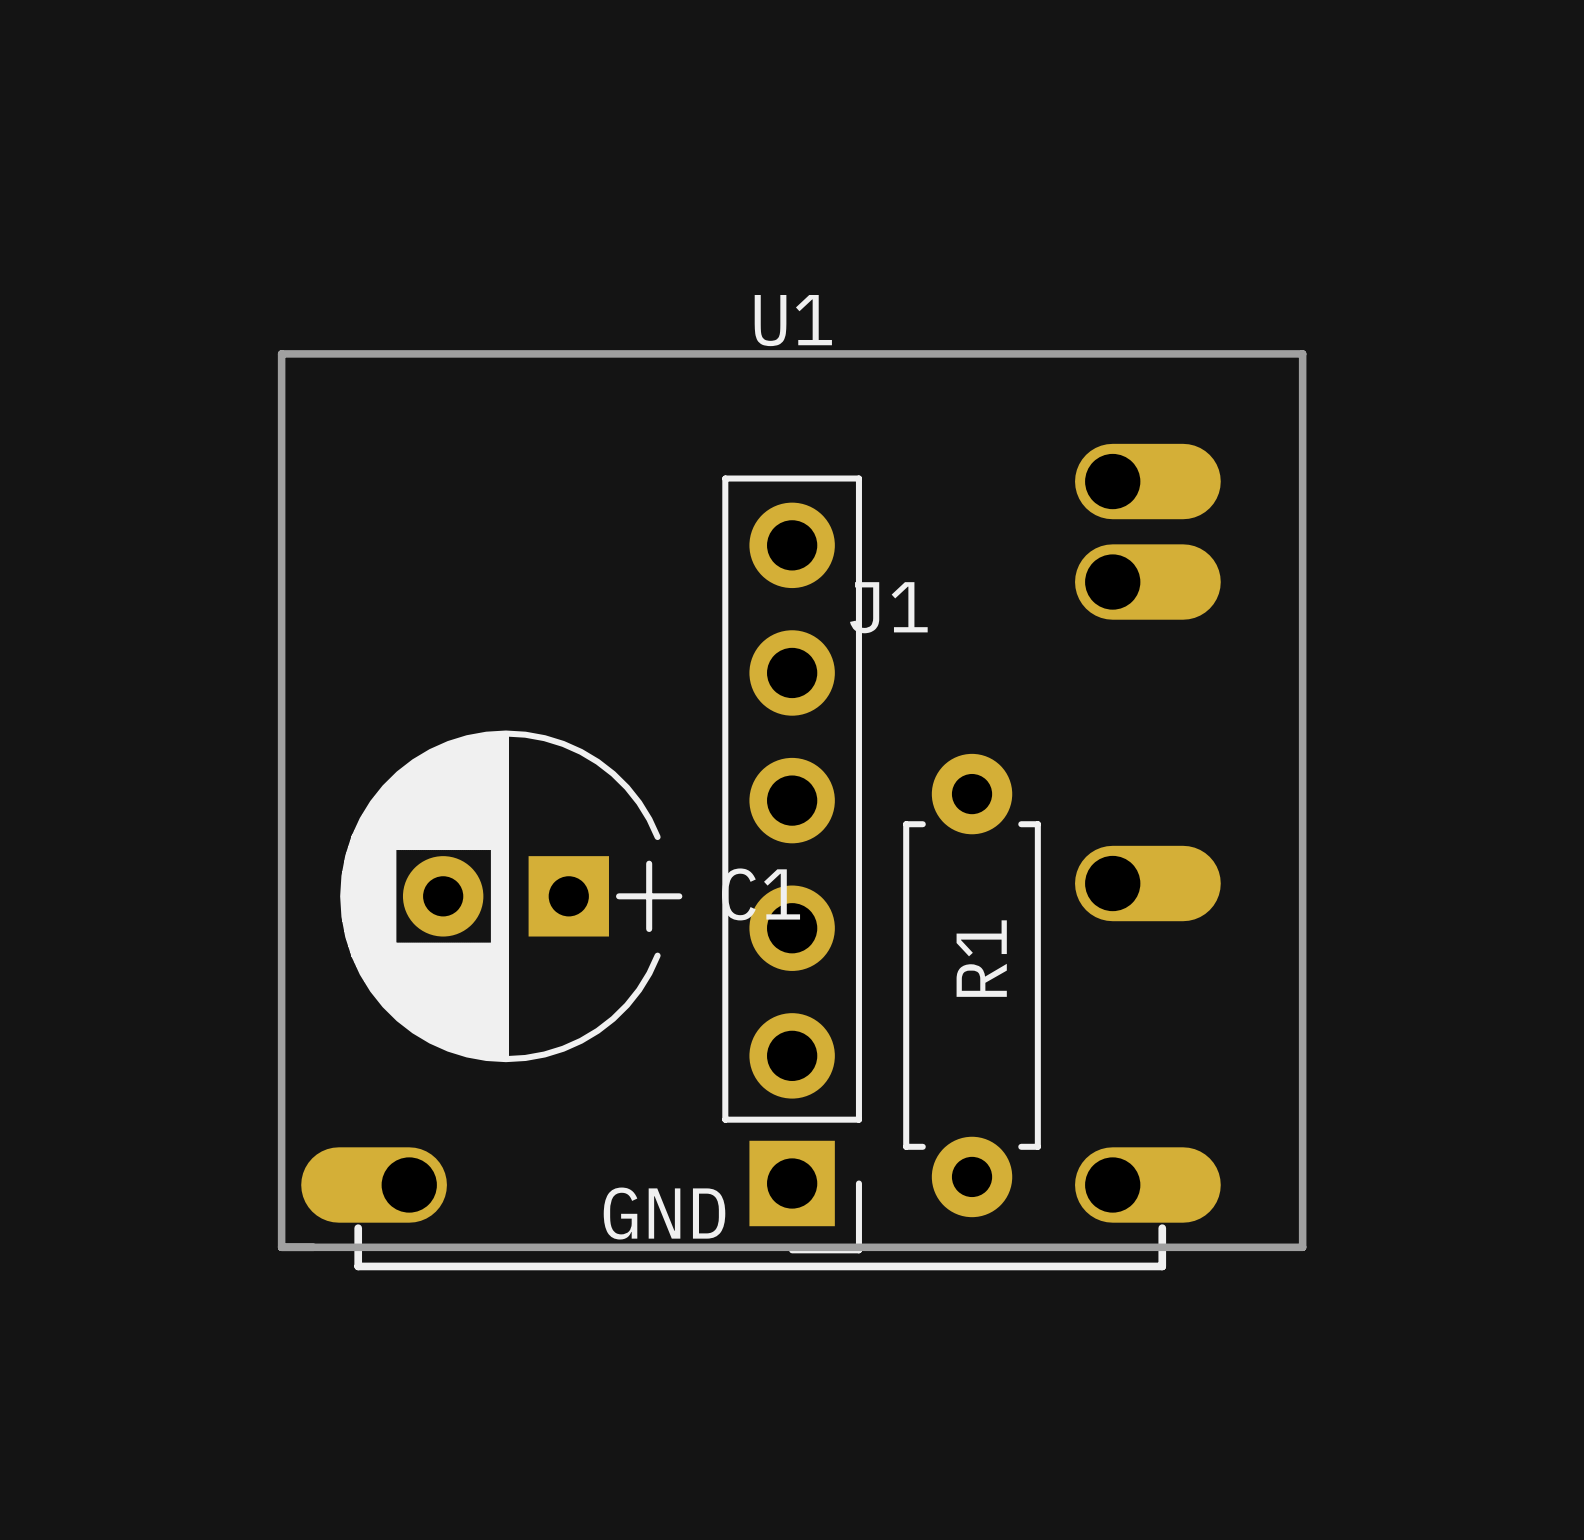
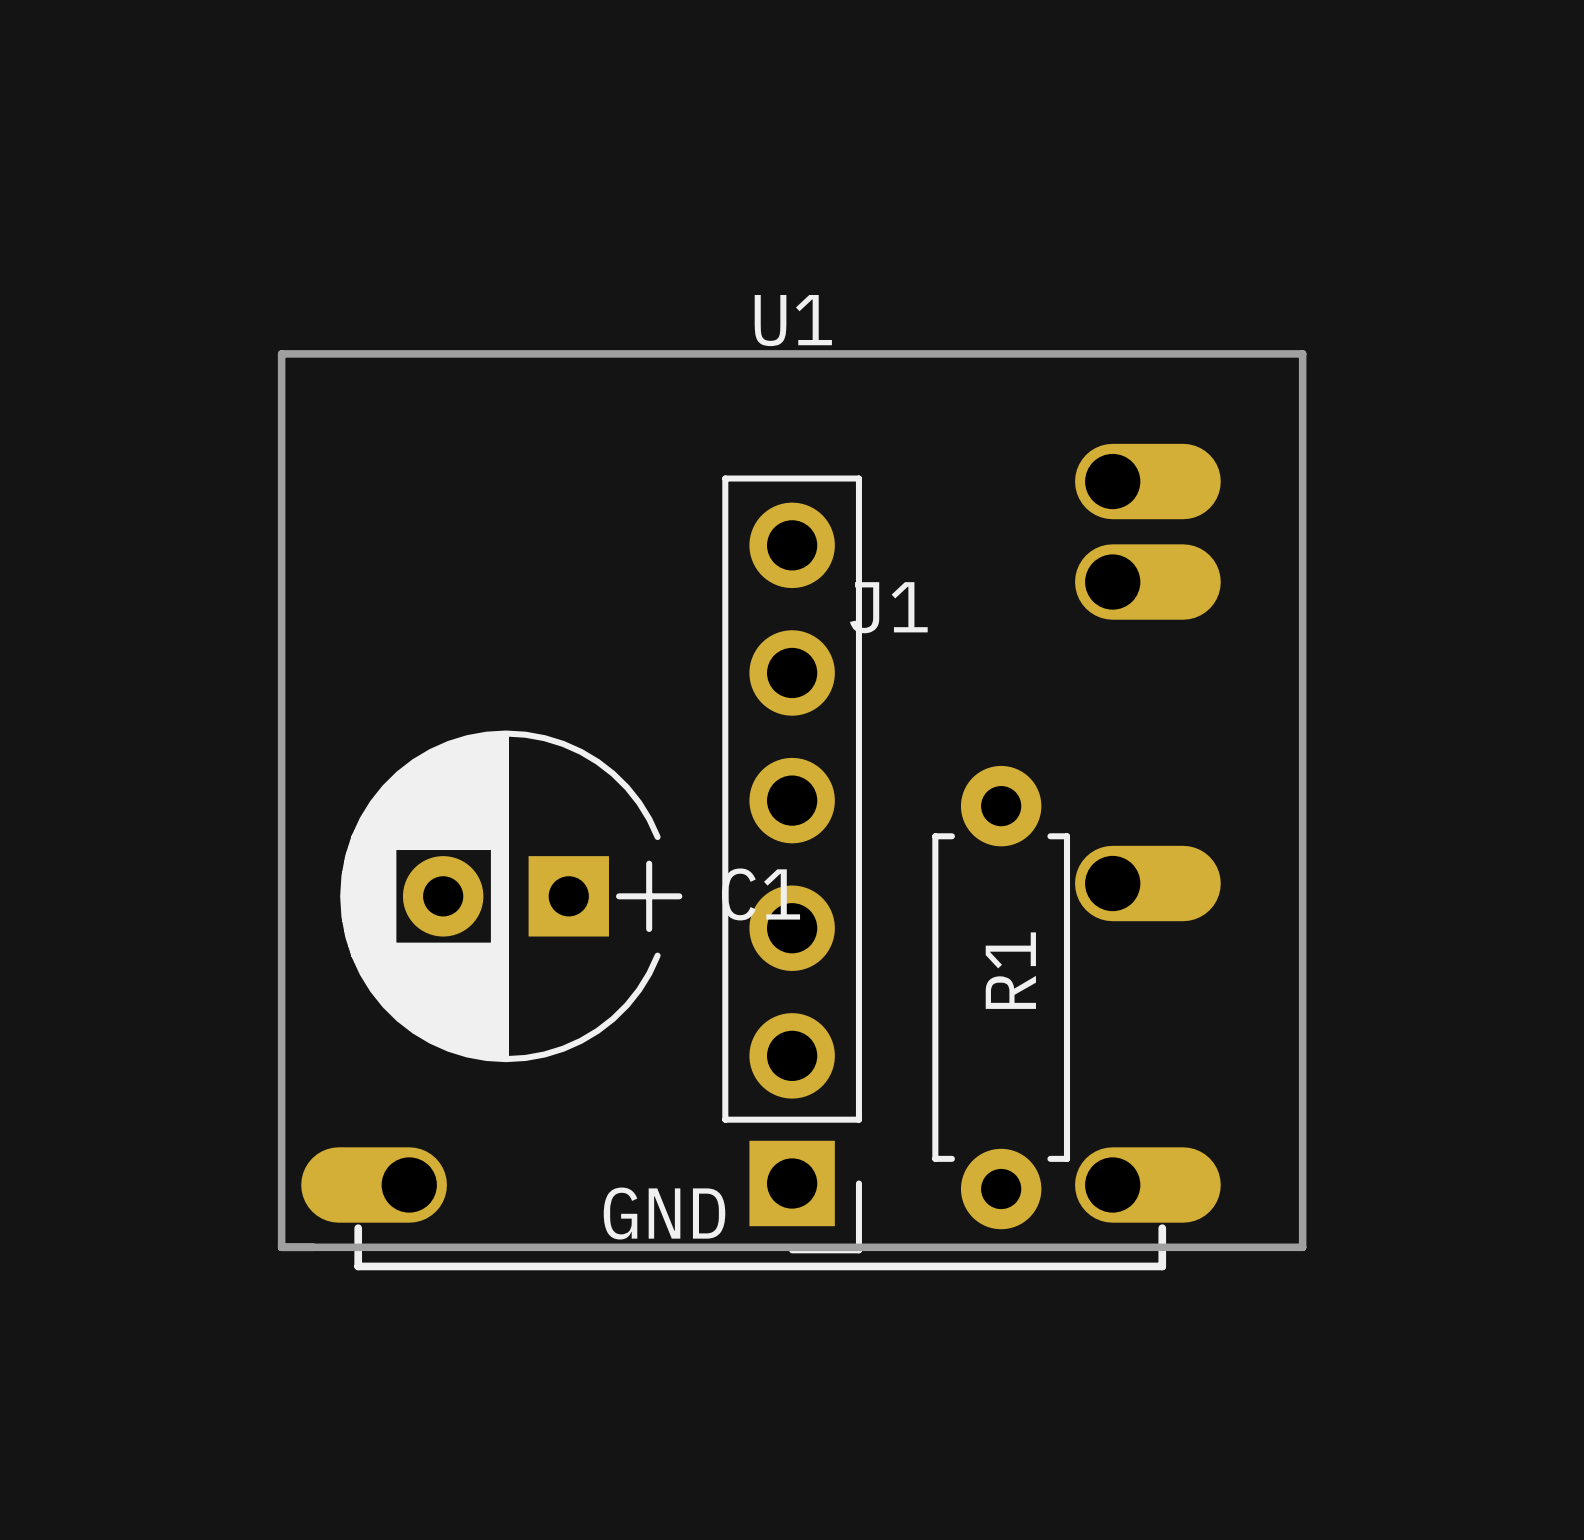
R1 position: (972, 985) -> (1001, 997)

